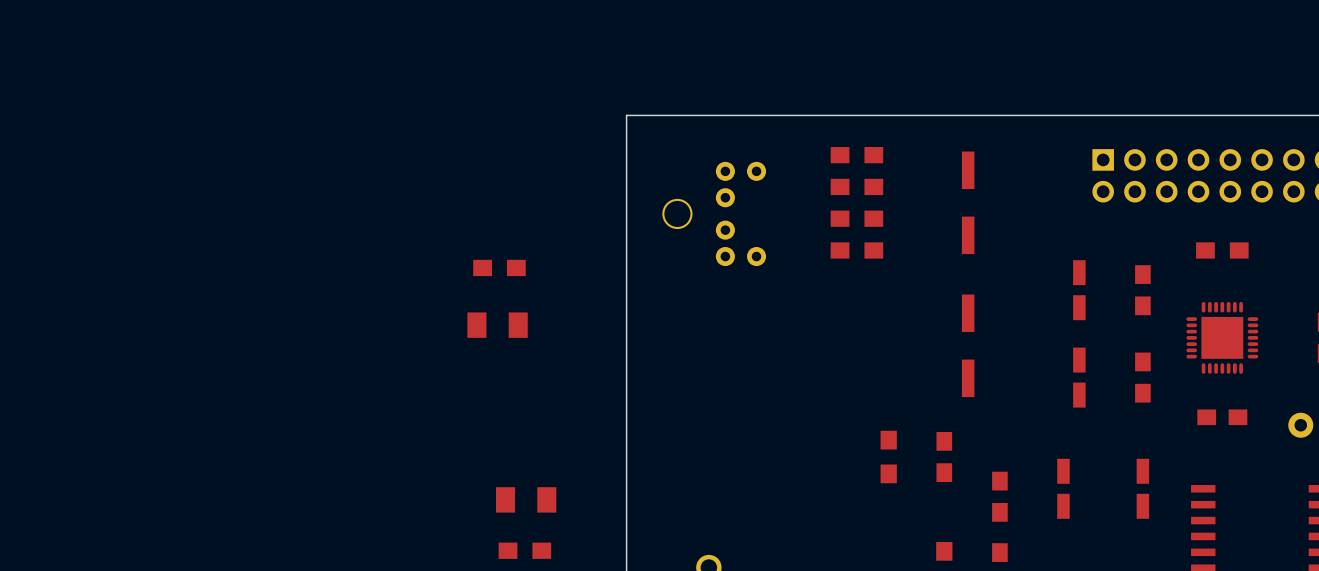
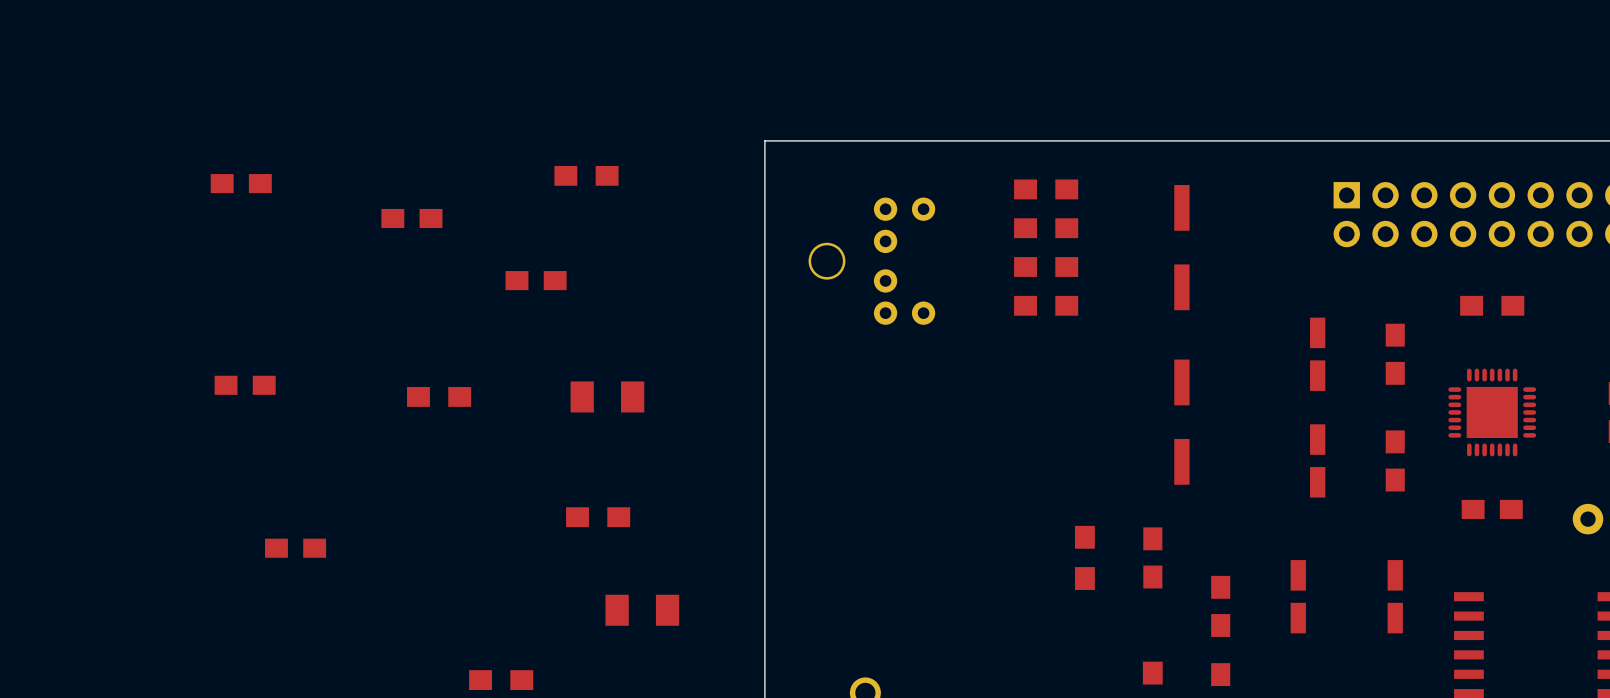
part: none -> (586, 175)
part: none -> (241, 183)
part: none -> (411, 218)
part: none -> (536, 280)
part: (499, 267) -> none
part: none -> (245, 385)
part: none -> (439, 396)
part: none -> (598, 517)
part: none -> (295, 548)
part: (524, 550) -> none
part: none -> (501, 680)

